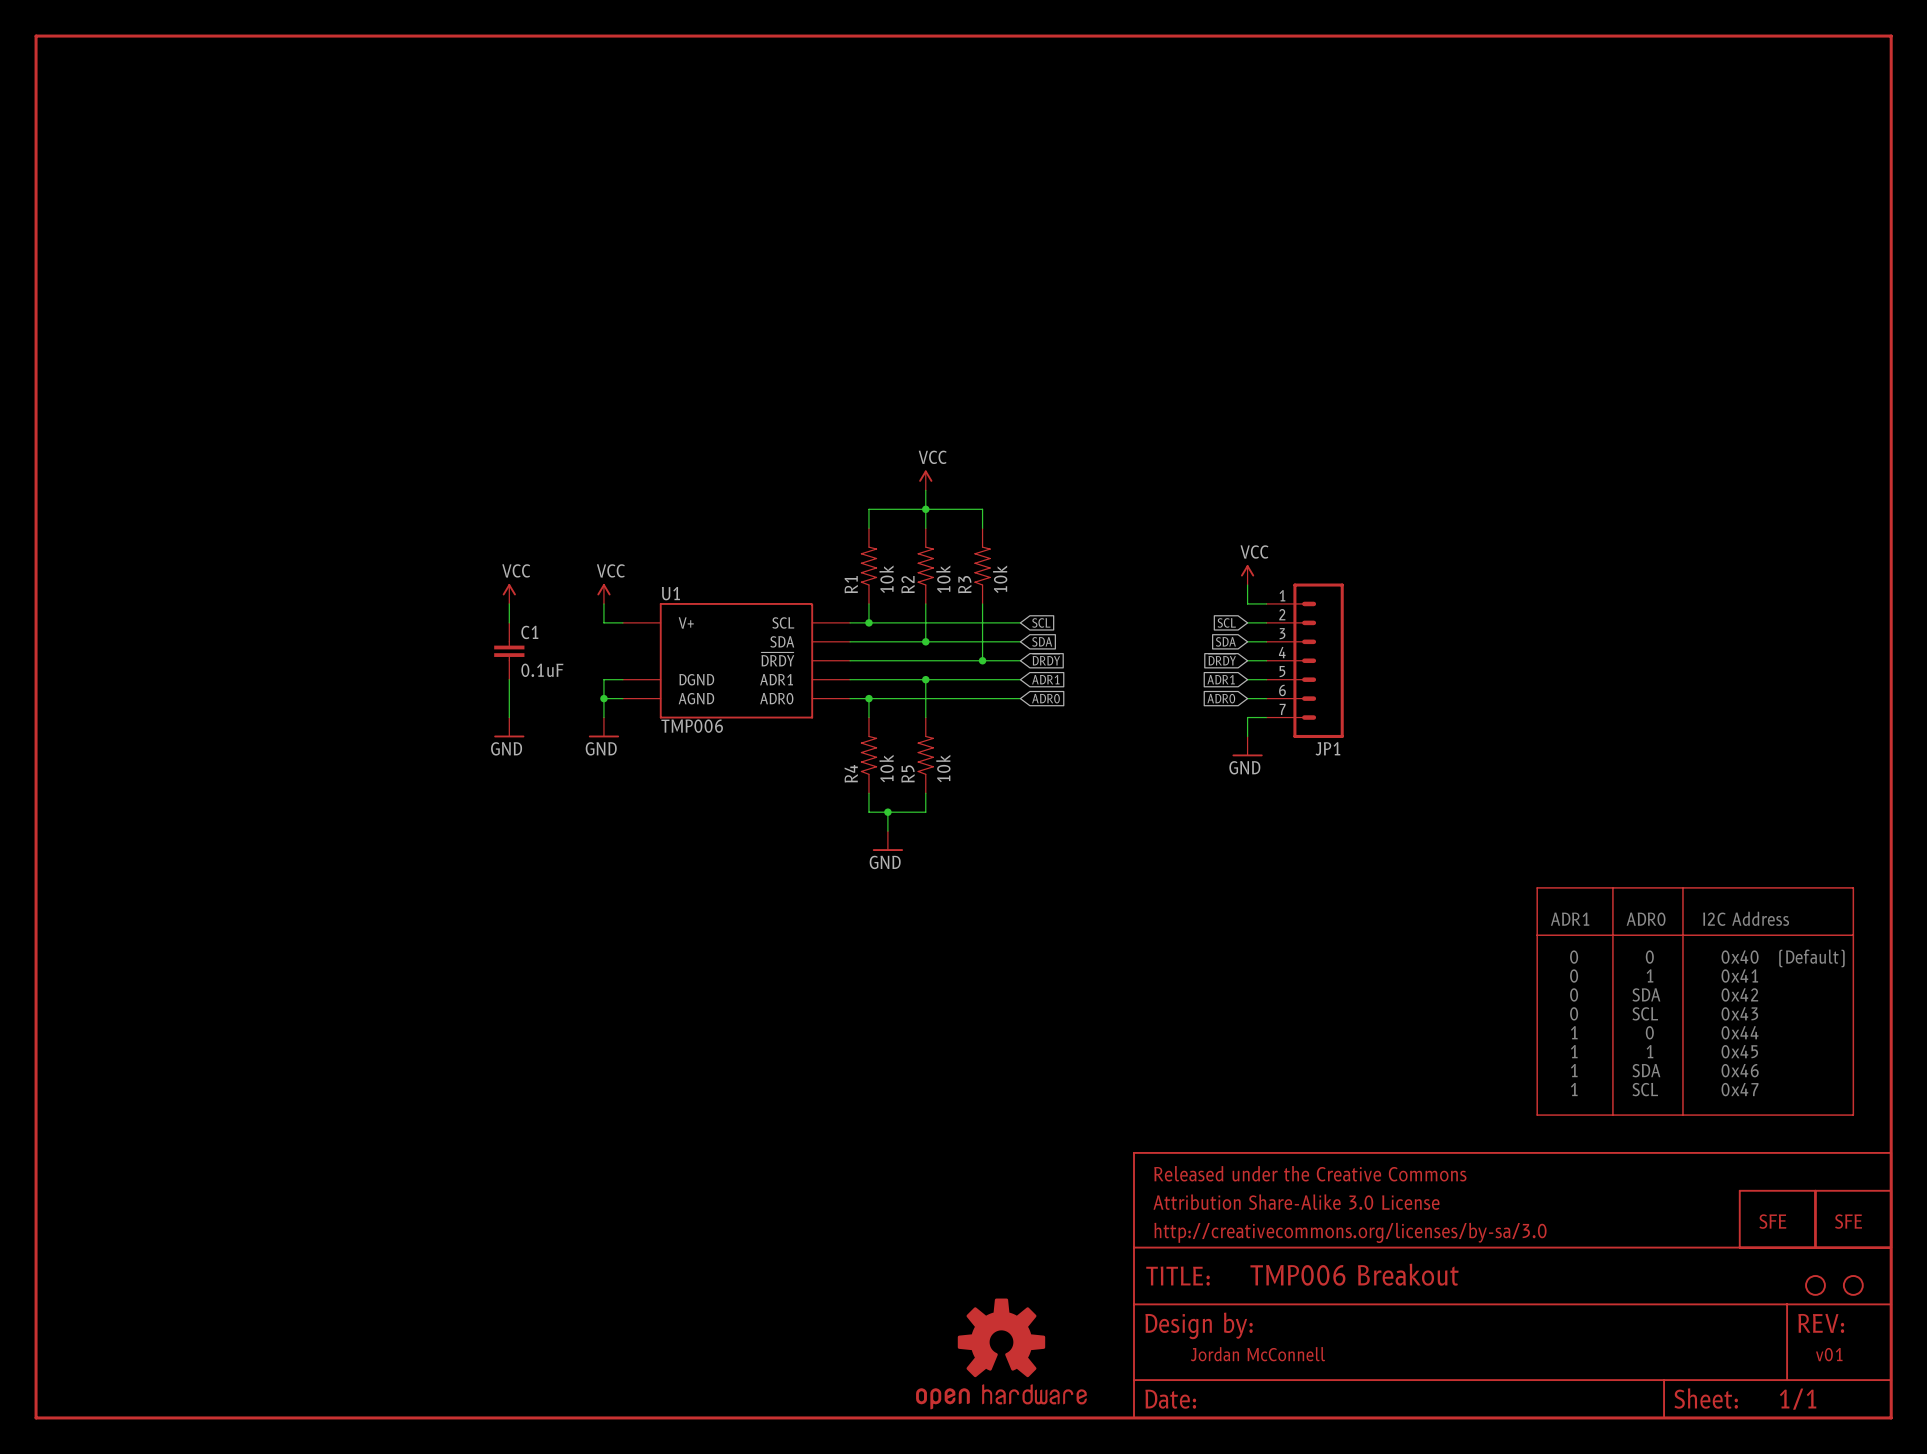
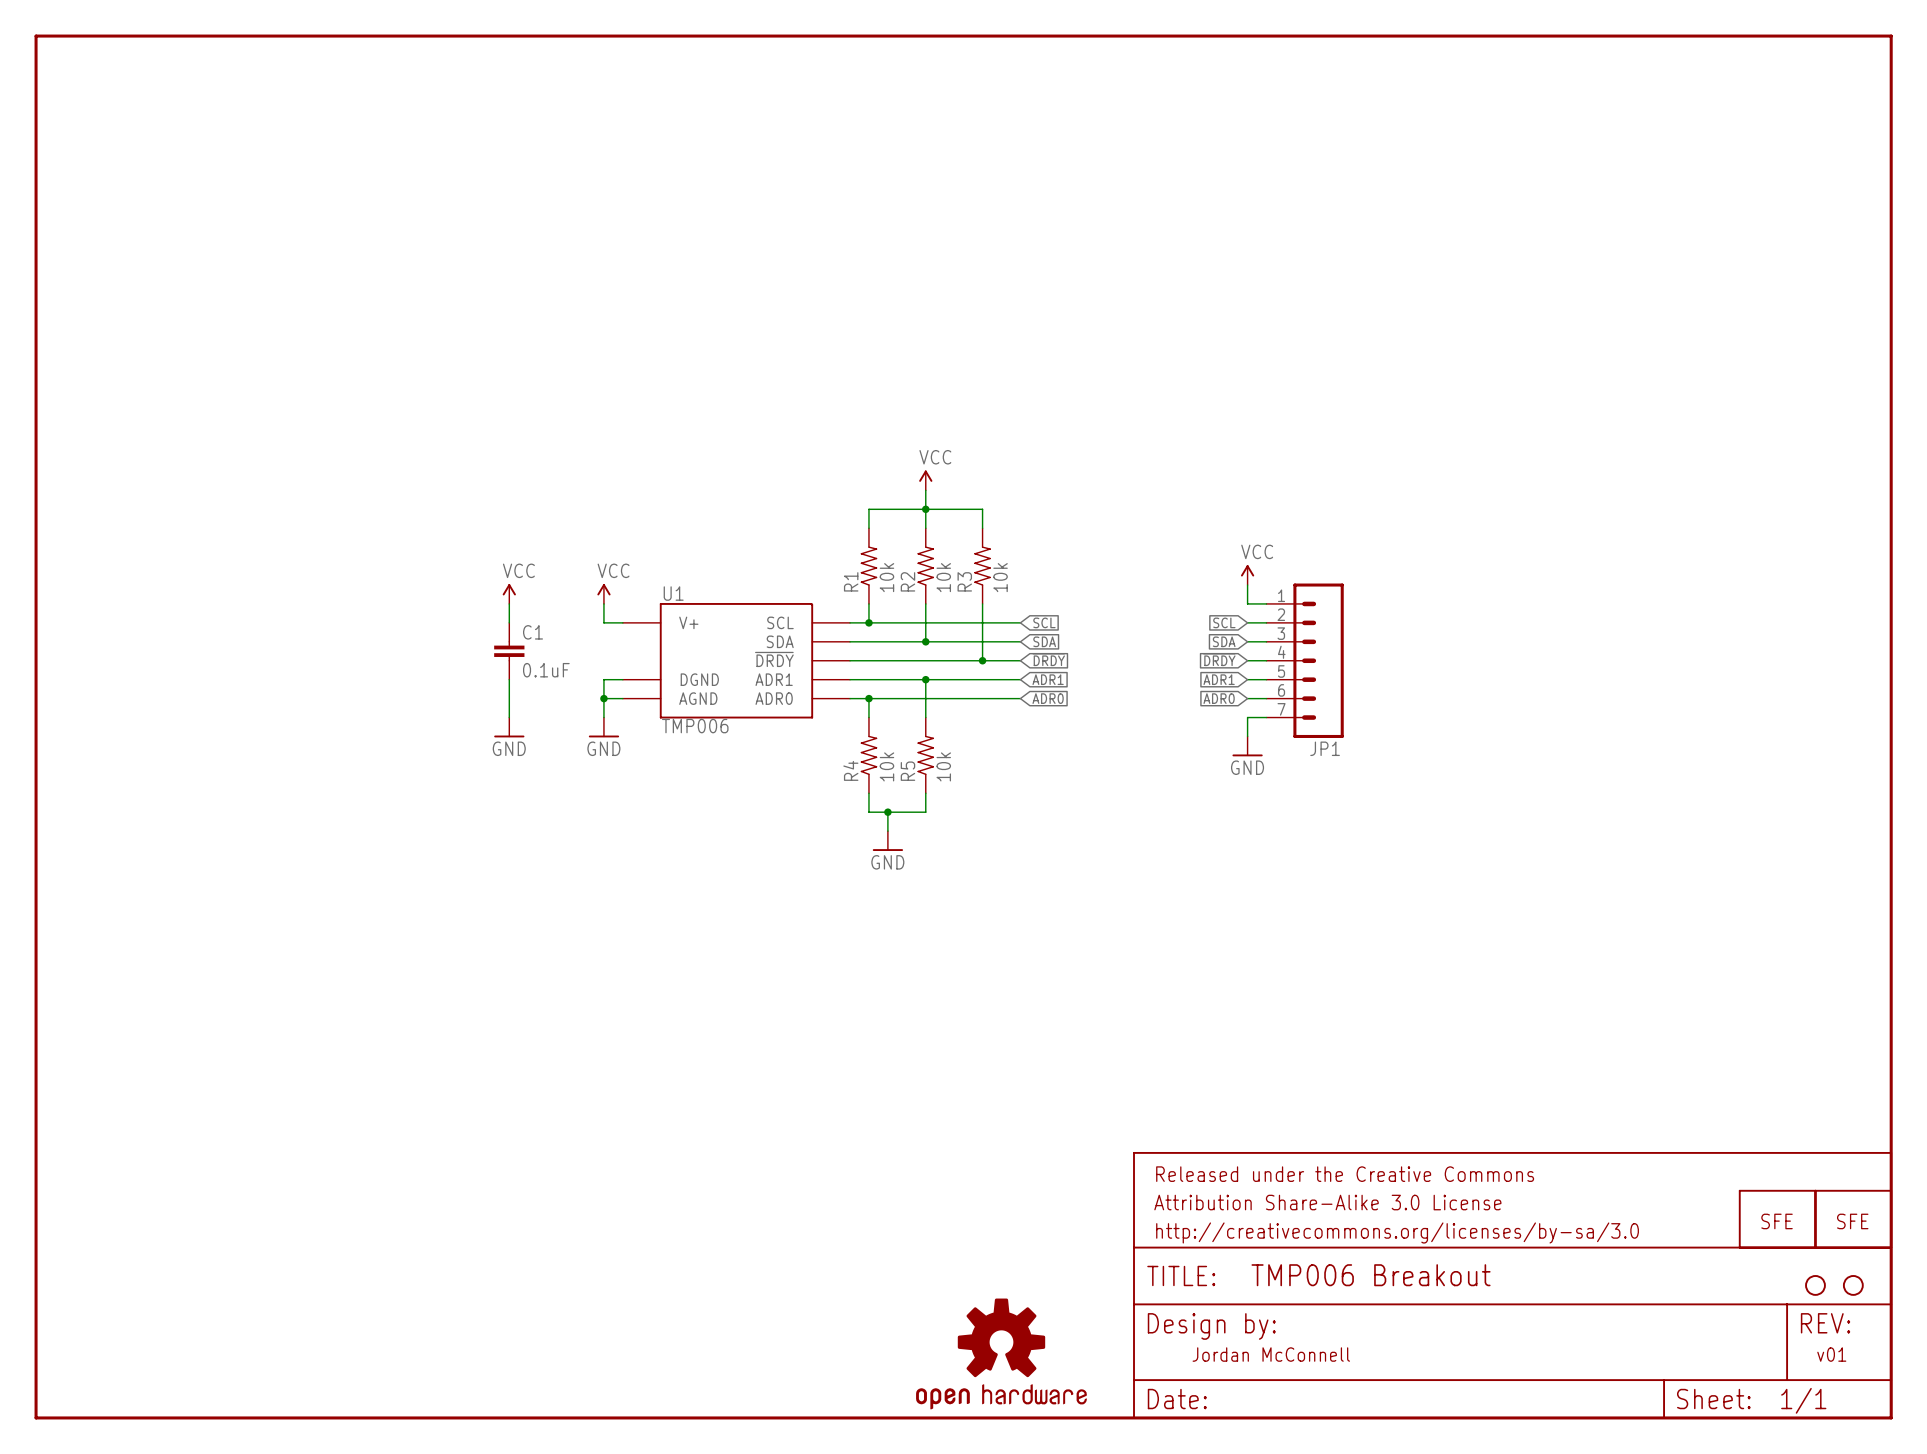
line: (1537, 887) (1537, 1115) (1853, 1115) (1853, 887) (1537, 887) -> none
line: (1612, 887) (1612, 1115) -> none
line: (1682, 887) (1682, 1115) -> none
text: I2C Address (1746, 918) -> none
text: ADR1 (1570, 919) -> none
text: ADR0 (1646, 919) -> none
line: (1537, 935) (1853, 935) -> none
text: 0 (1574, 957) -> none
text: 0 (1649, 957) -> none
text: 0x40 (1740, 957) -> none
text: (Default) (1811, 958) -> none
text: 1 (1650, 975) -> none
text: 0 (1574, 976) -> none
text: 0x41 (1739, 976) -> none
text: 0 (1574, 994) -> none
text: SDA (1646, 994) -> none
text: 0x42 (1739, 994) -> none
text: 0 (1574, 1013) -> none
text: SCL (1645, 1013) -> none
text: 0x43 (1739, 1013) -> none
text: 1 (1574, 1032) -> none
text: 0 (1649, 1032) -> none
text: 0x44 (1740, 1032) -> none
text: 1 (1574, 1051) -> none
text: 1 (1650, 1051) -> none
text: 0x45 (1739, 1051) -> none
text: 1 (1574, 1070) -> none
text: SDA (1646, 1070) -> none
text: 0x46 (1740, 1070) -> none
text: 1 (1574, 1089) -> none
text: SCL (1645, 1089) -> none
text: 0x47 (1740, 1089) -> none

